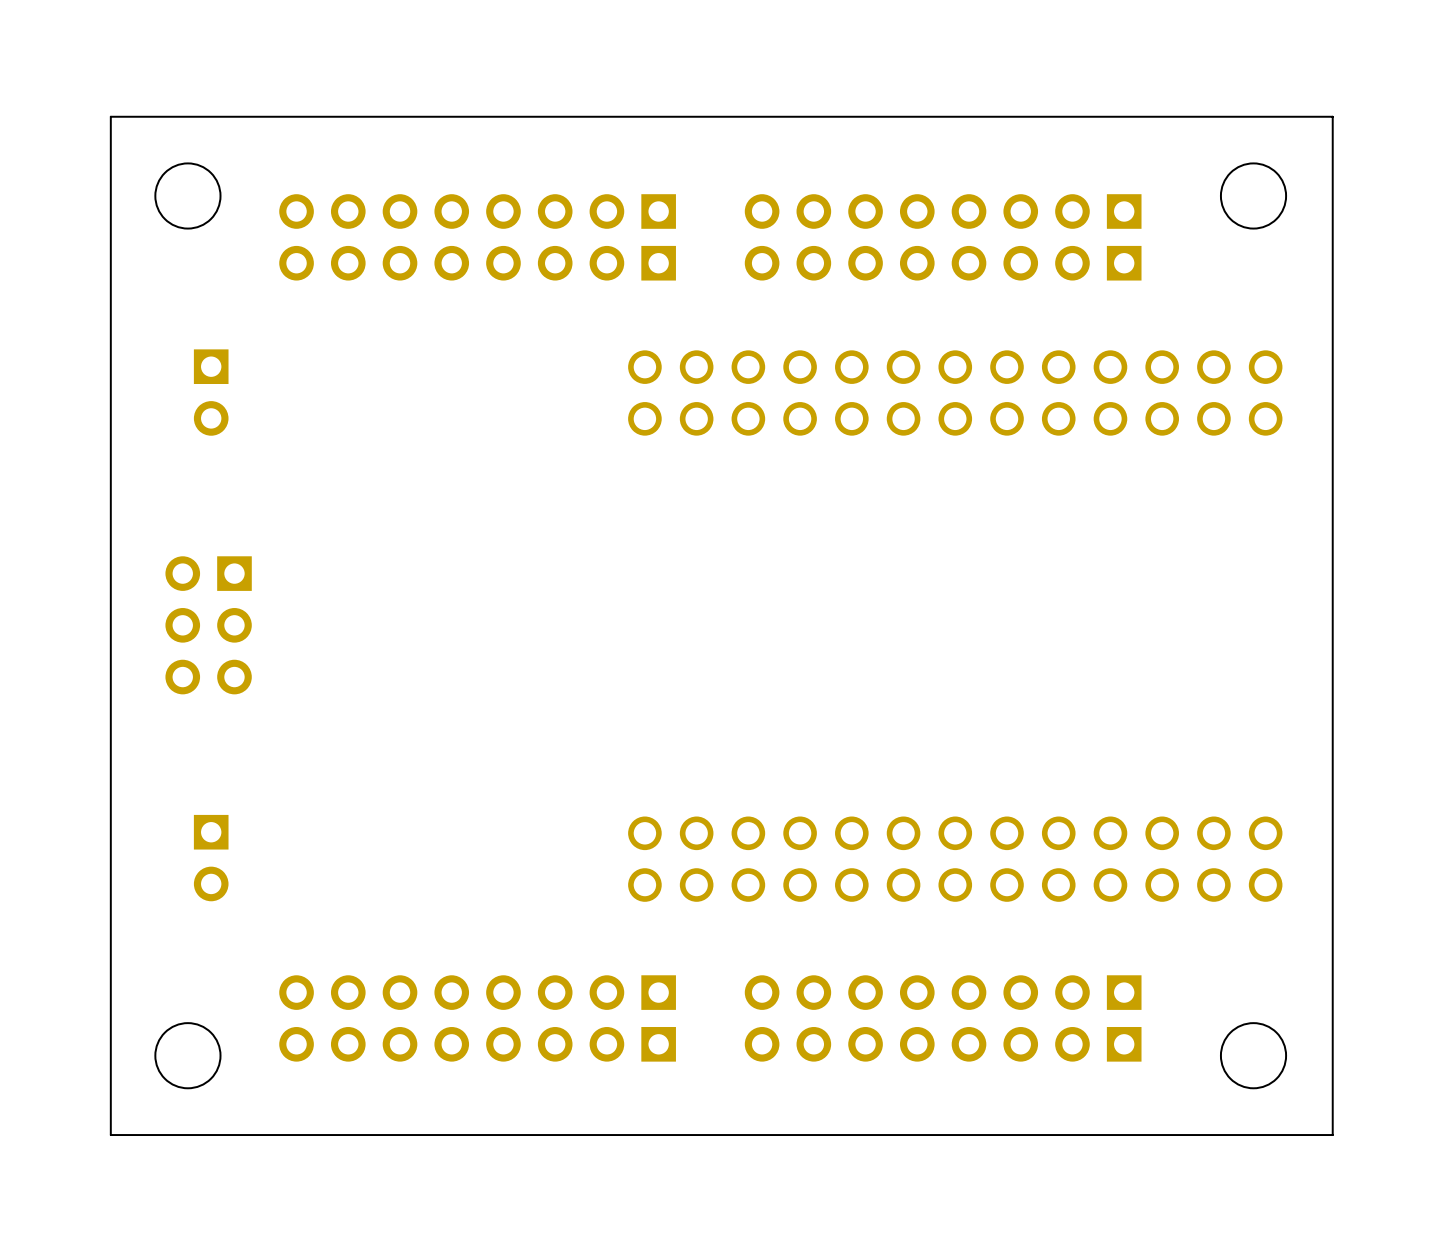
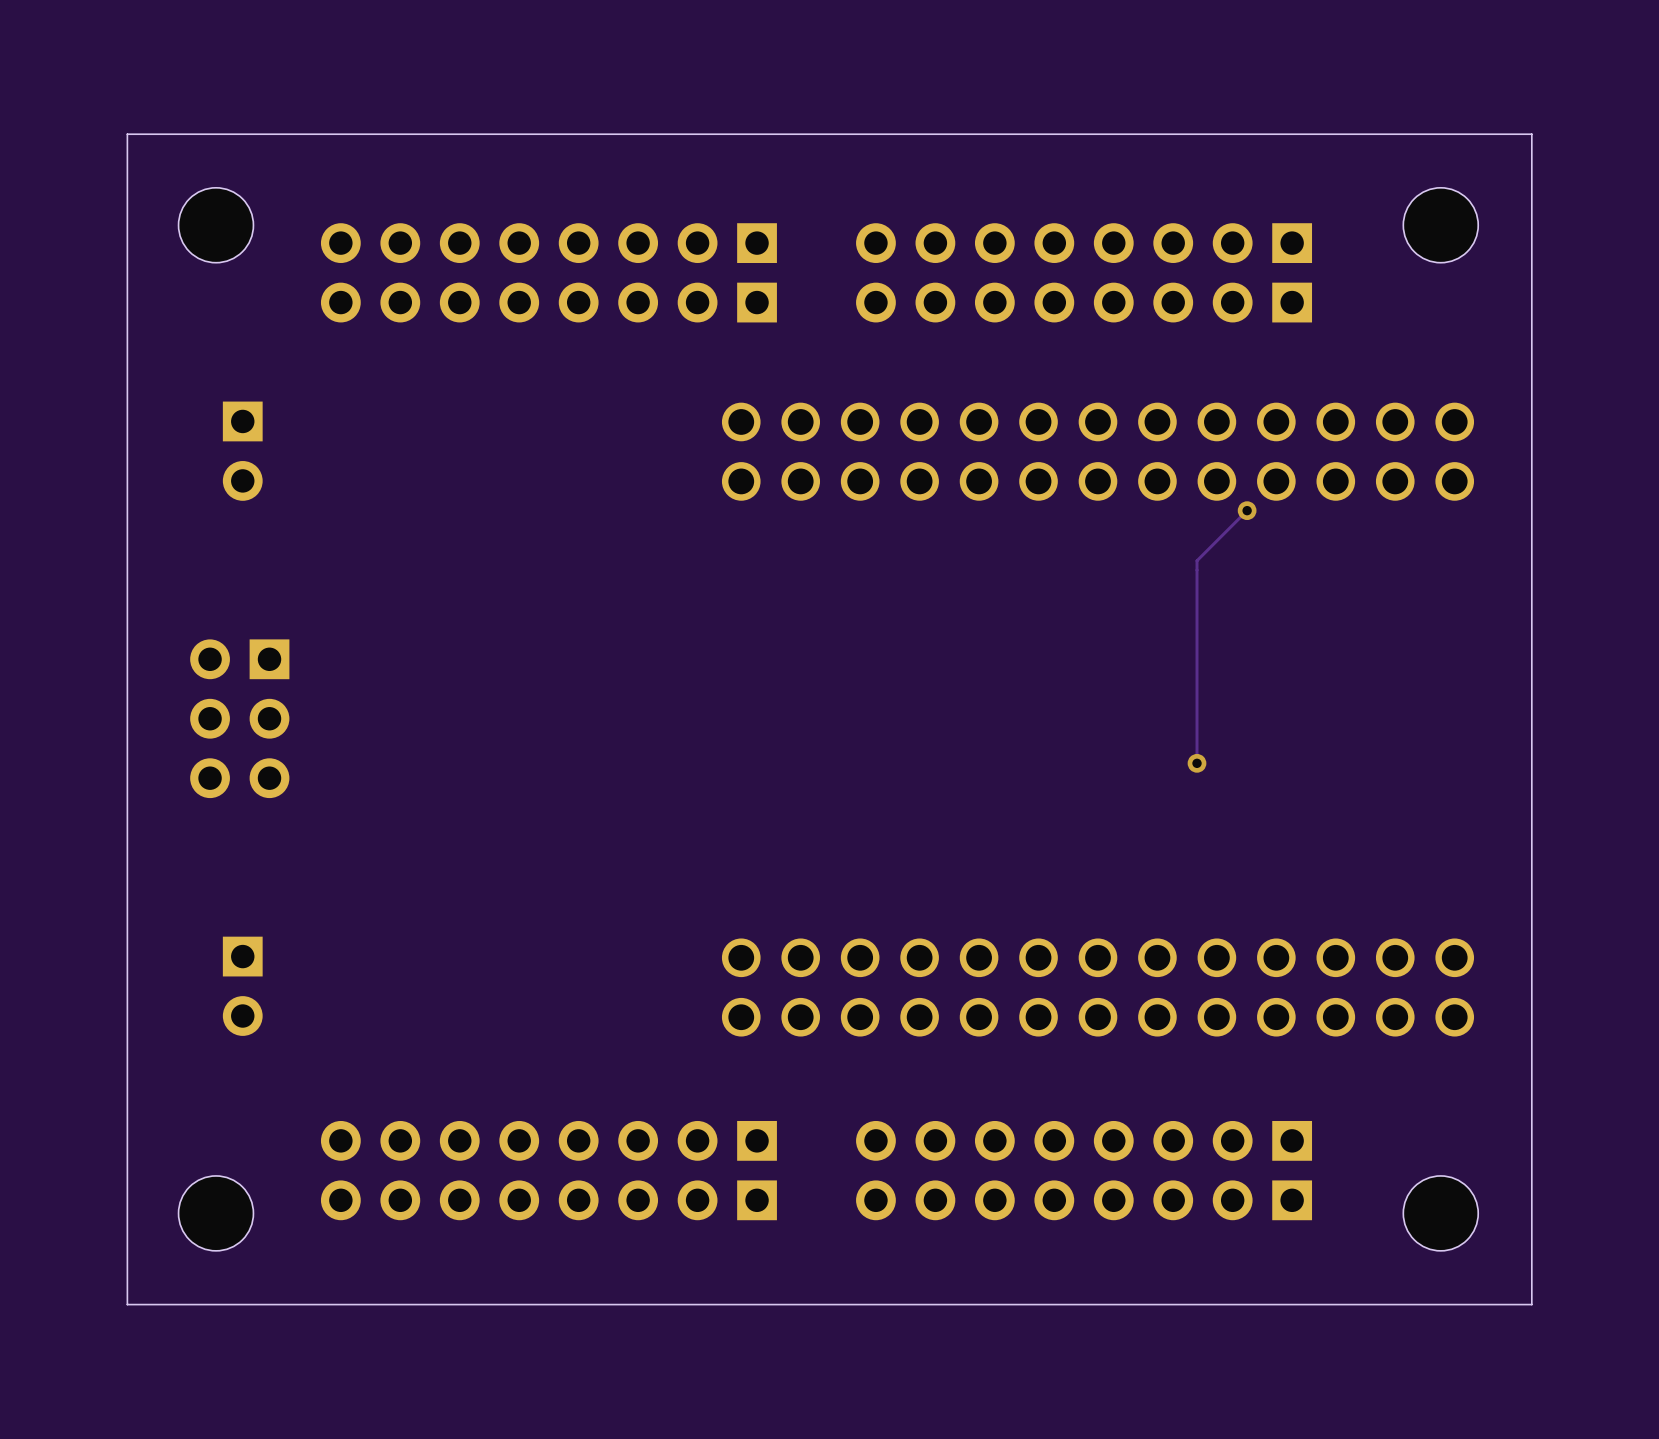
track: none -> (1247, 510) (1197, 560) (1197, 763)
via: none -> (1247, 510)
via: none -> (1197, 763)

